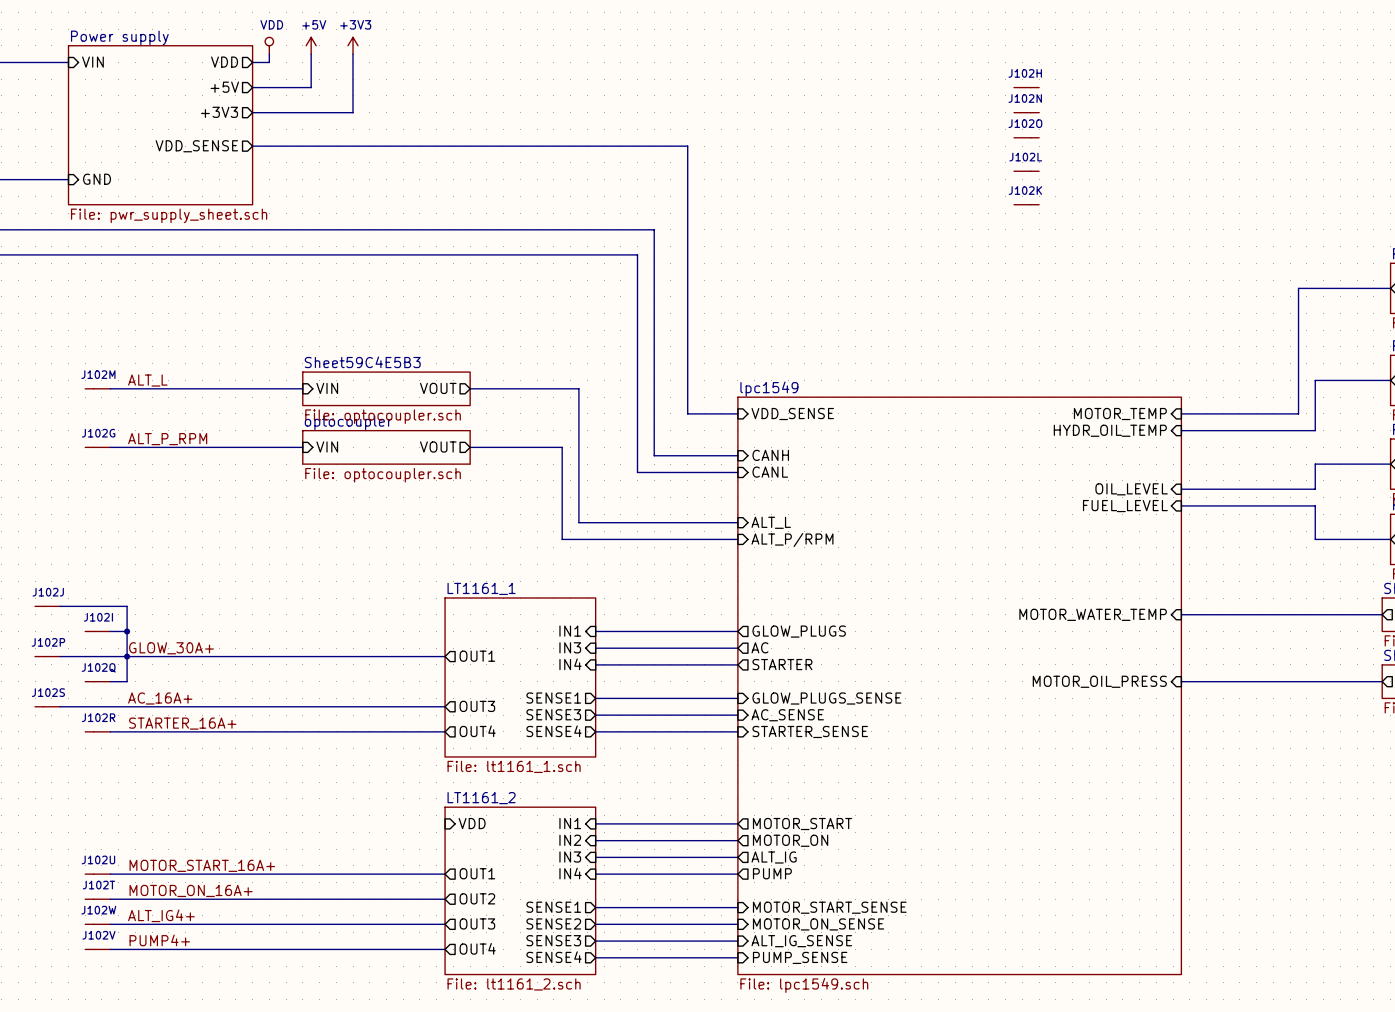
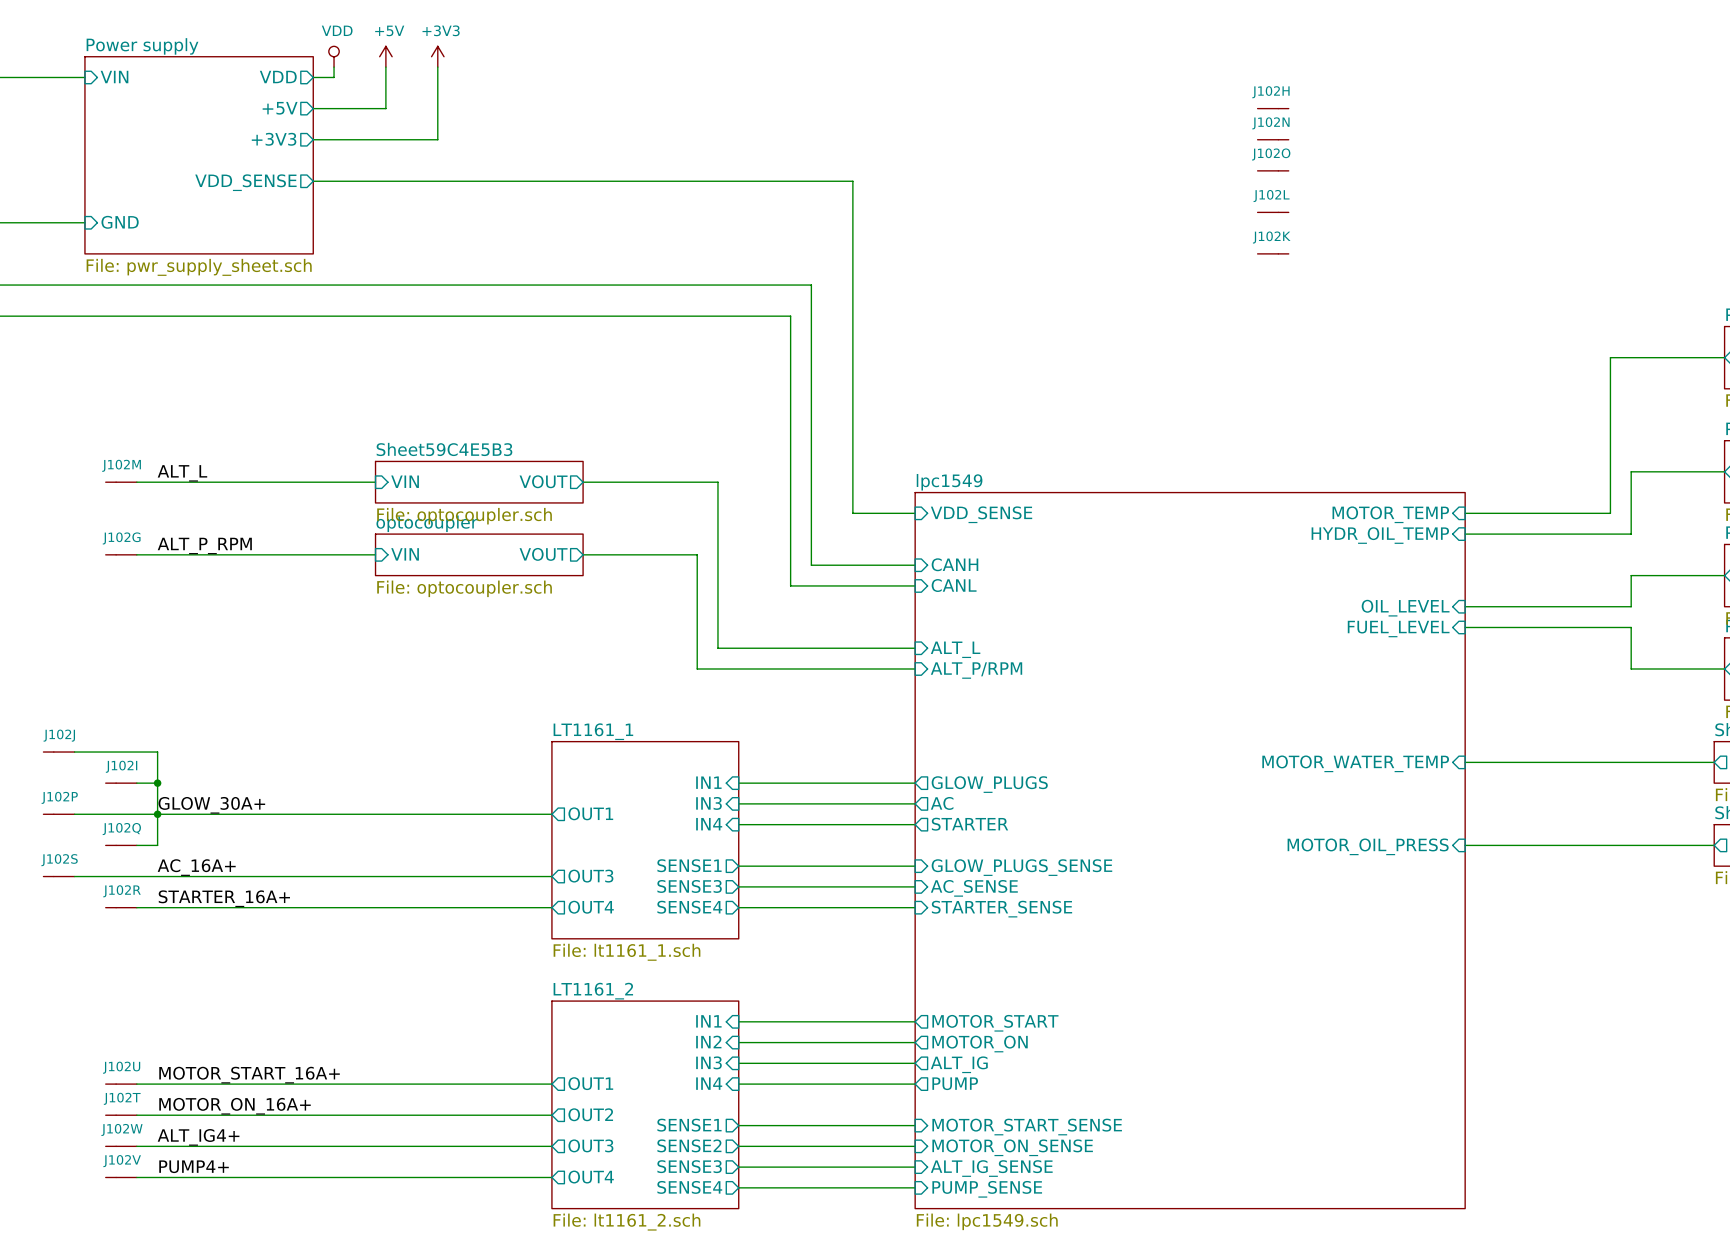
sheet pin: VDD (472, 823) -> none

